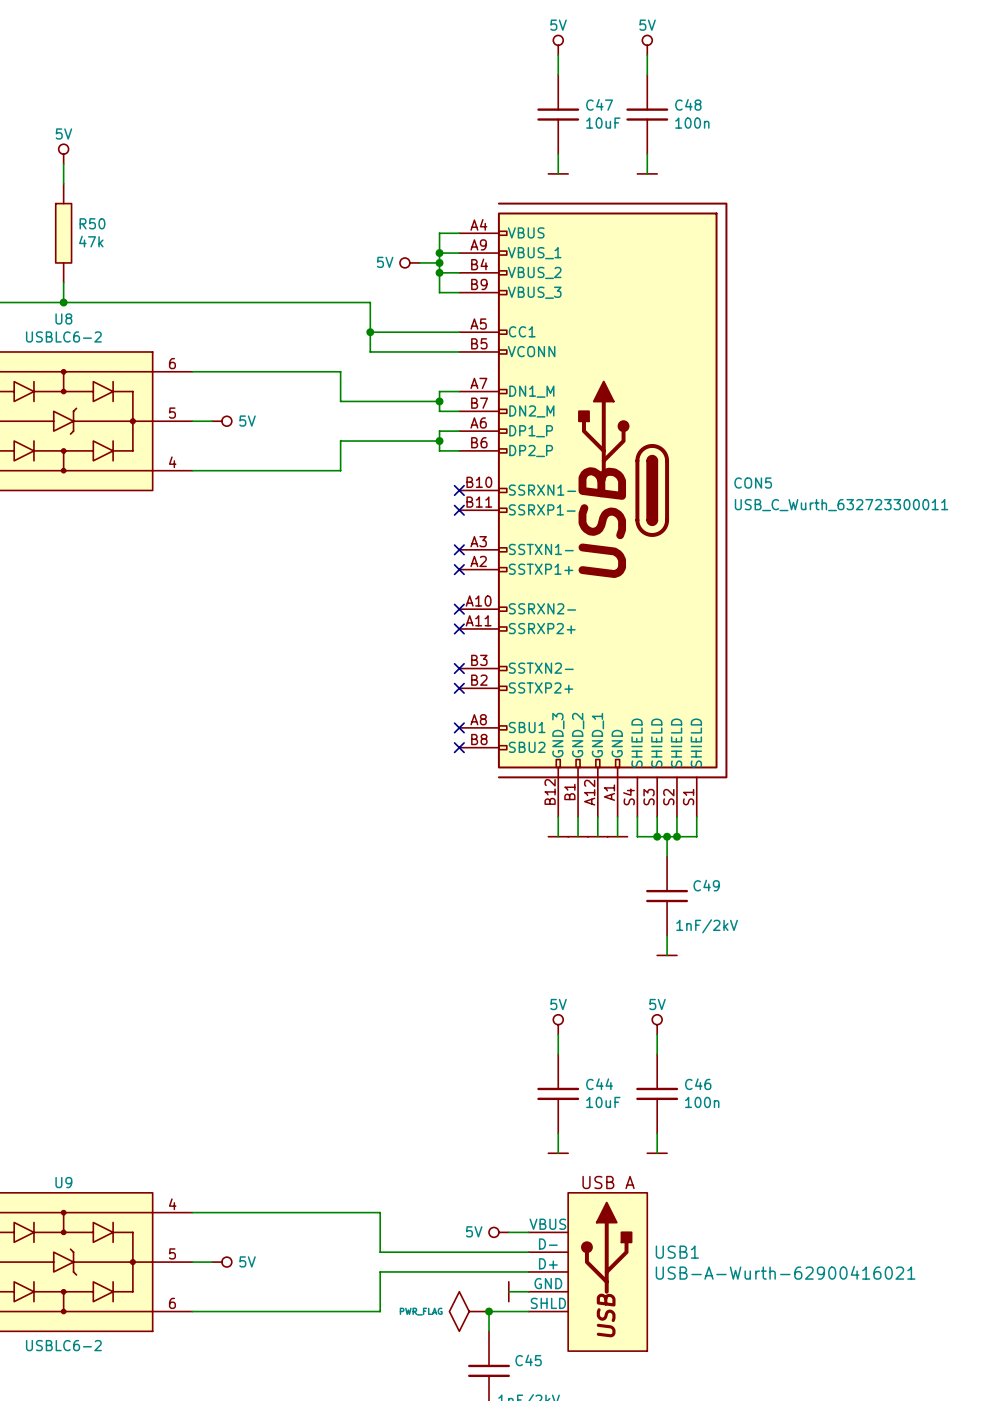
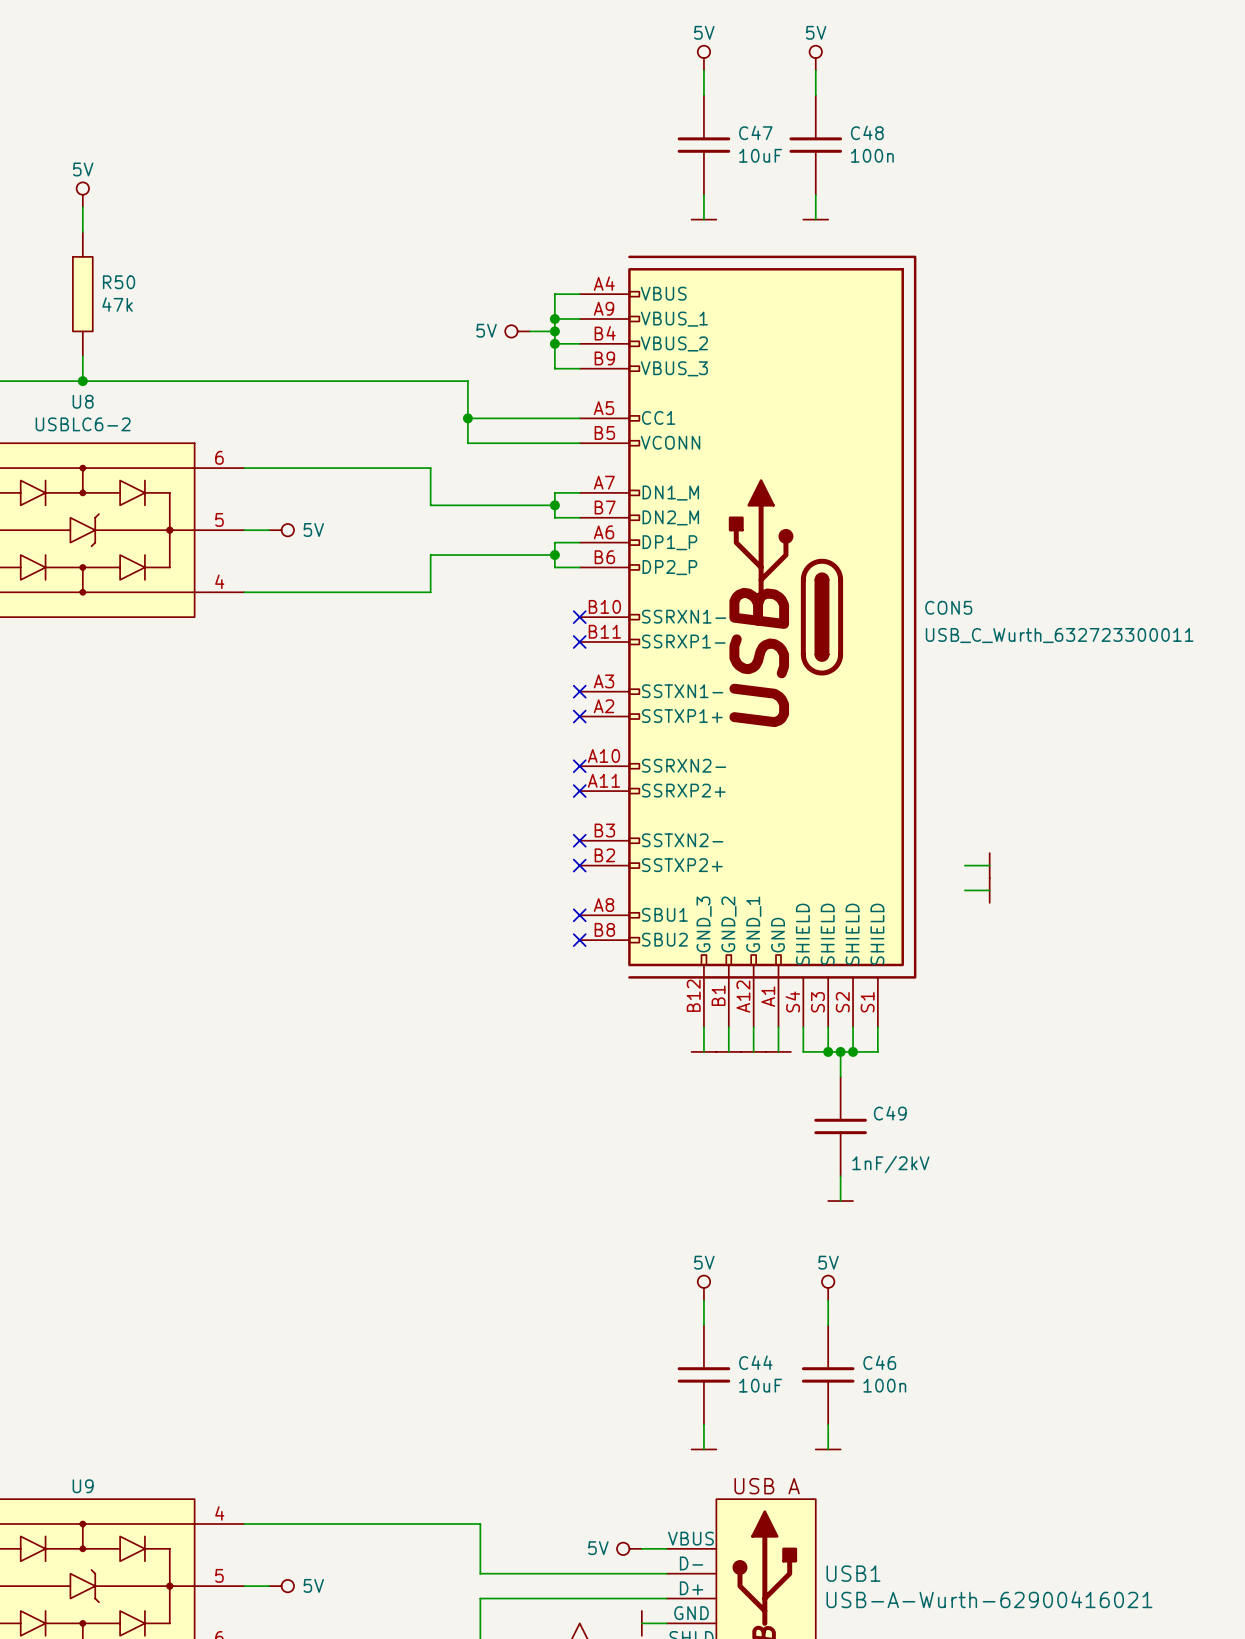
wire: none -> (964, 865) (989, 865)
power symbol: none -> (989, 865)
wire: none -> (964, 890) (989, 890)
power symbol: none -> (989, 890)

